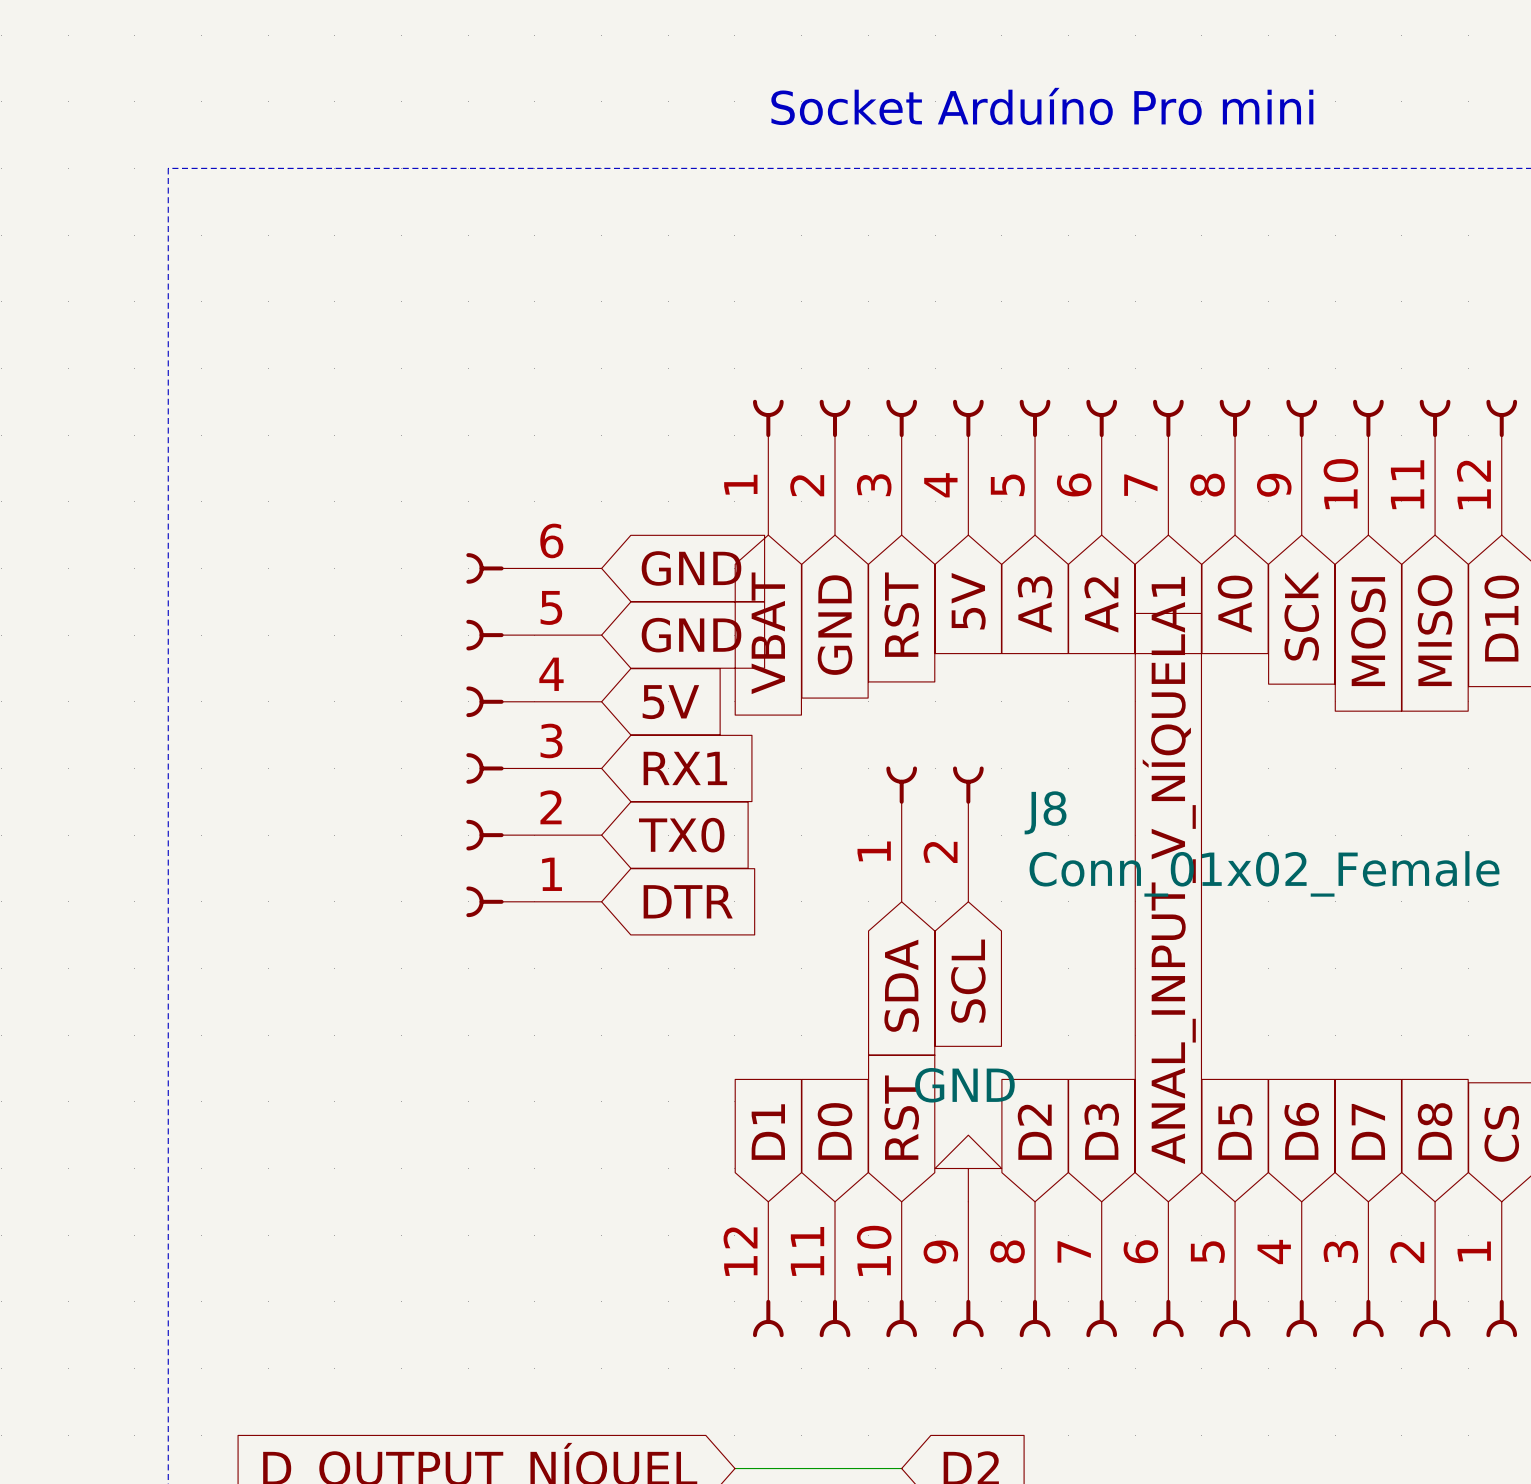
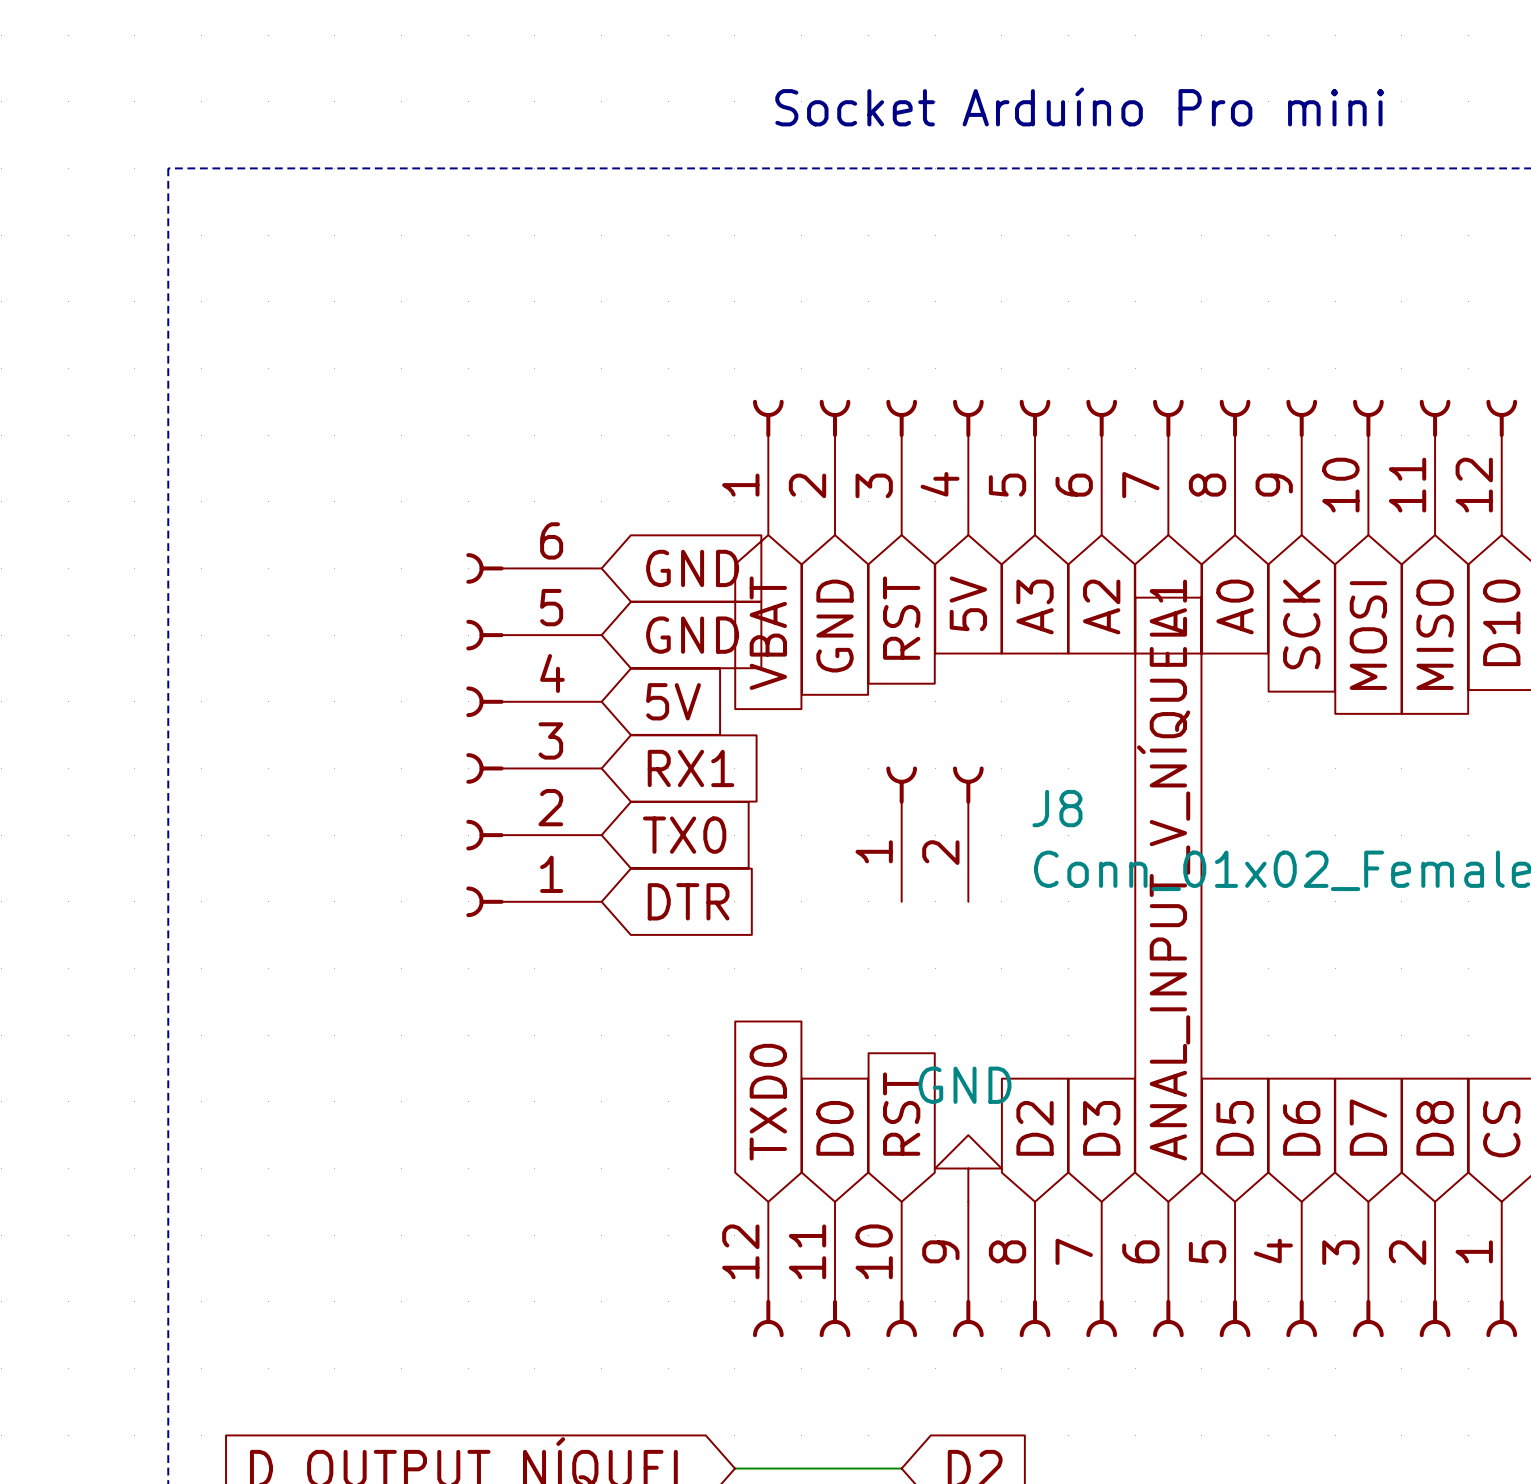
global label: SCL (968, 981) -> none
global label: SDA (901, 985) -> none
global label: D1 (768, 1132) -> TXD0 (768, 1102)

